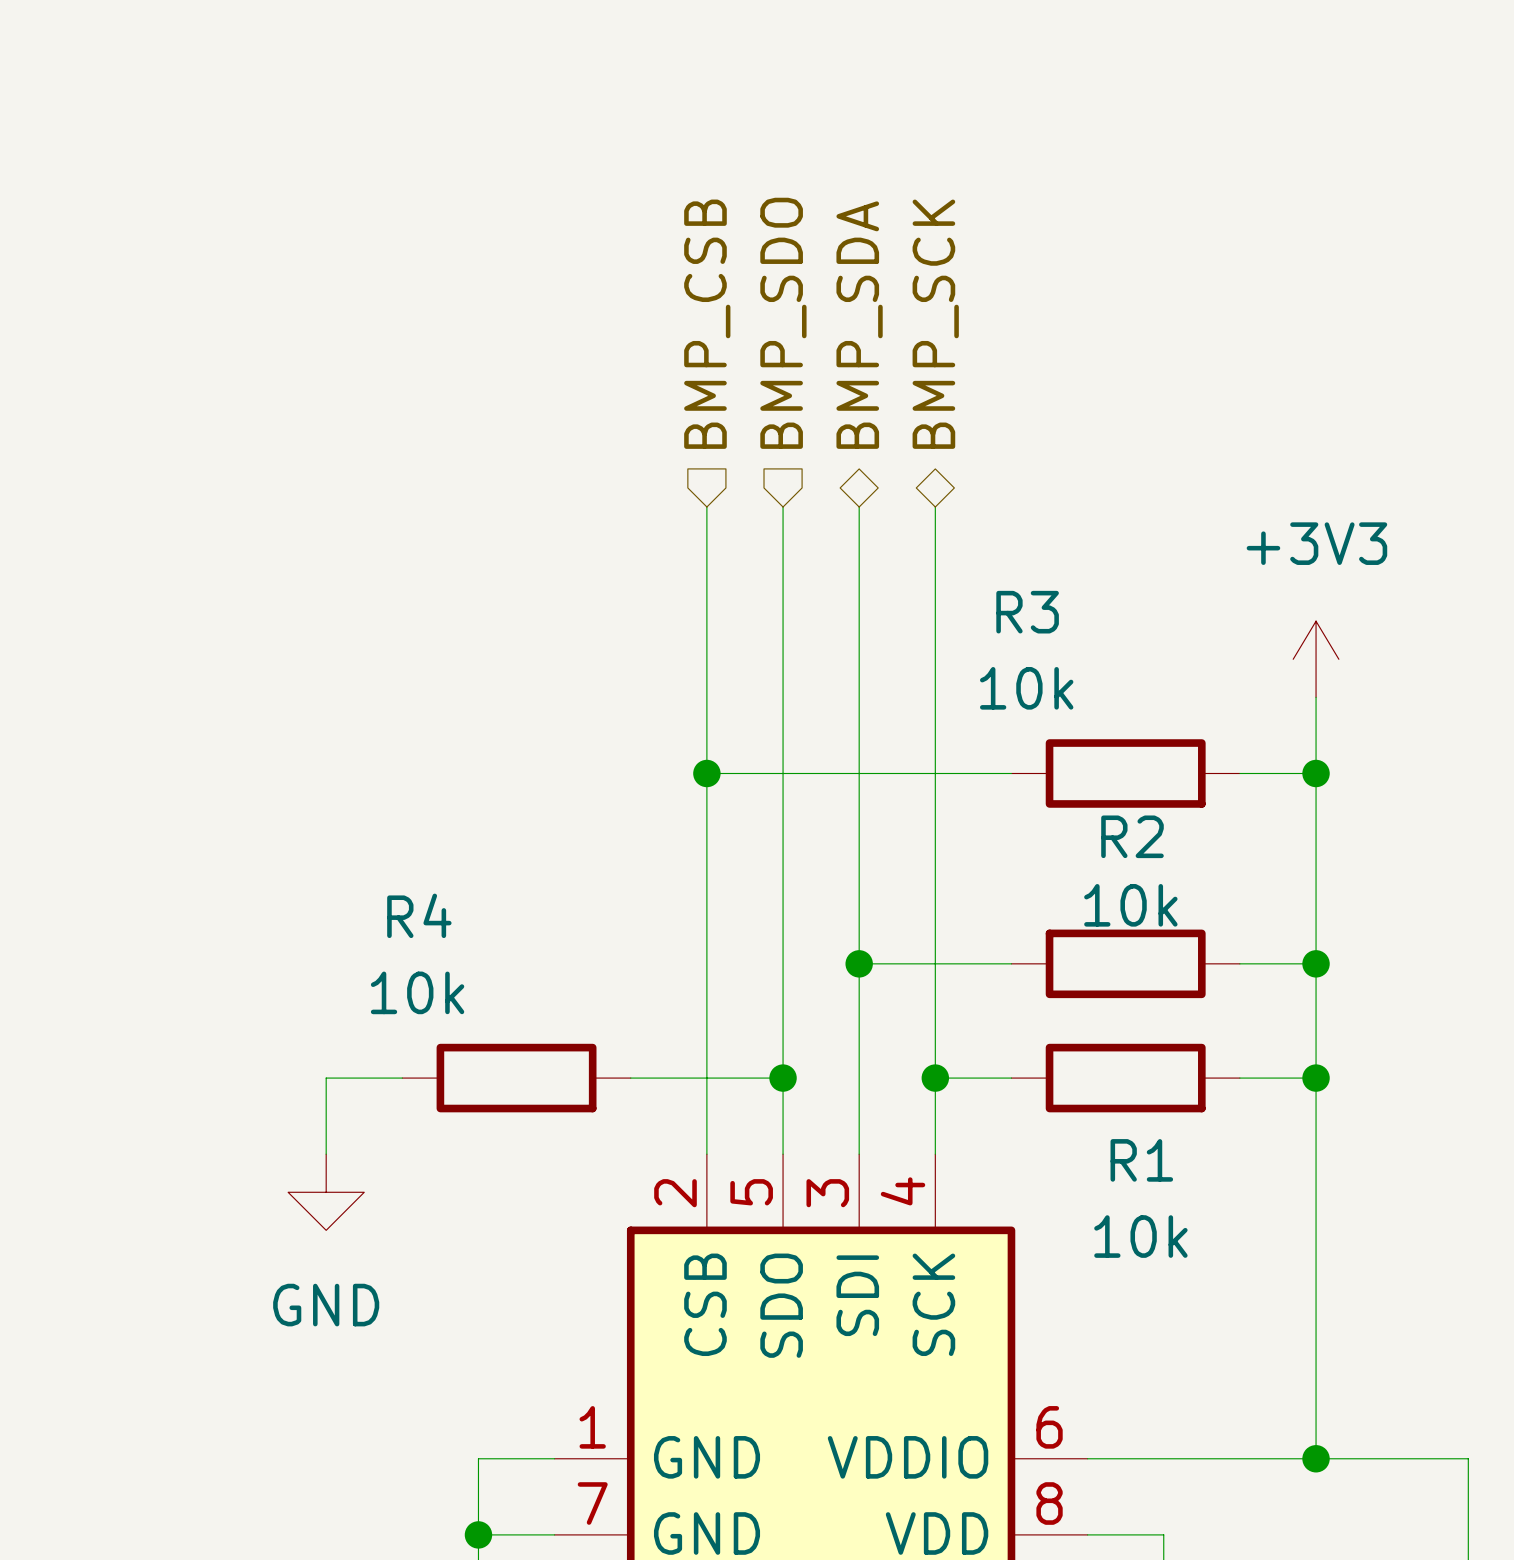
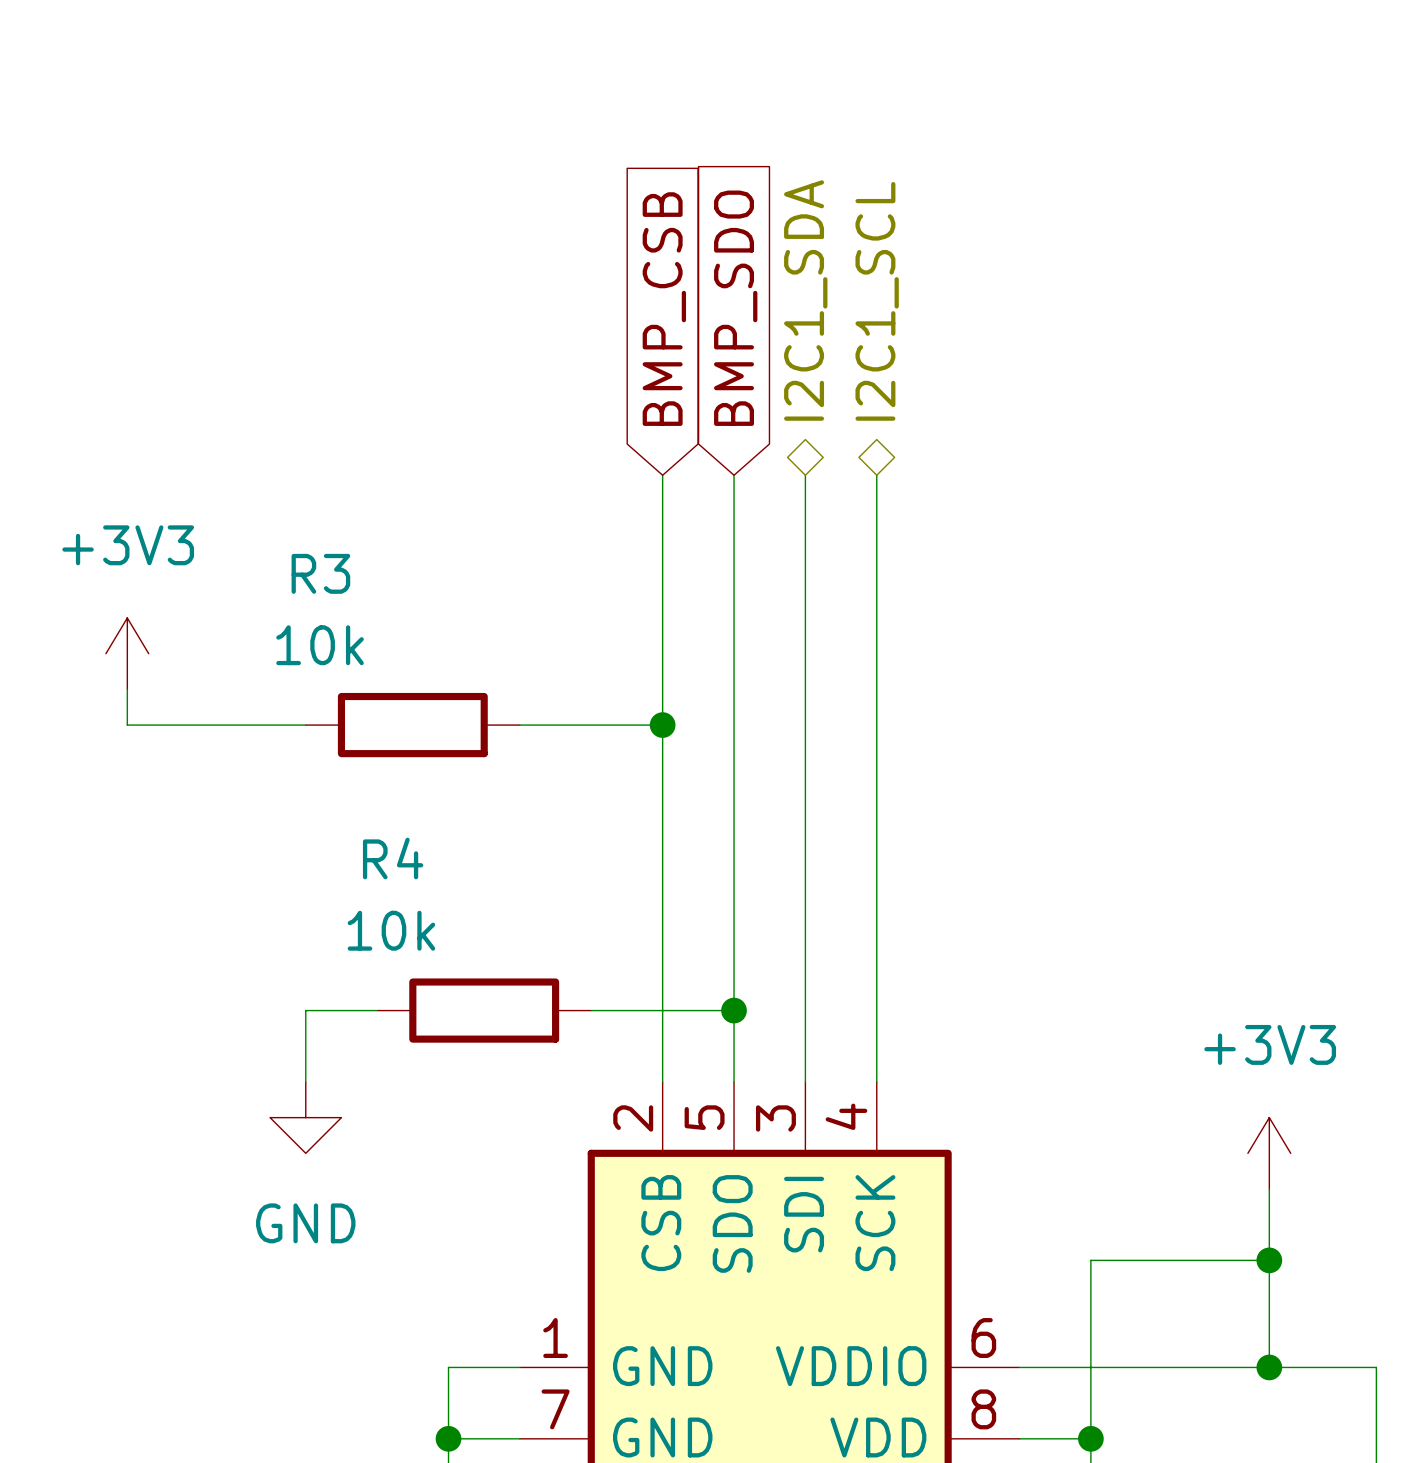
hierarchical label: BMP_SDO (783, 323) -> none
hierarchical label: BMP_CSB (707, 324) -> none
hierarchical label: BMP_SCK (935, 324) -> I2C1_SCL (877, 301)
hierarchical label: BMP_SDA (859, 325) -> I2C1_SDA (805, 300)
global label: none -> BMP_SDO (735, 308)
global label: none -> BMP_CSB (664, 309)
power symbol position: +3V3 (1316, 659) -> +3V3 (1269, 1153)
power symbol: none -> +3V3 (127, 653)
wire: (1316, 697) (1316, 1458) -> none
wire: none -> (127, 689) (127, 725) (305, 725)
wire: (706, 773) (1011, 773) -> (662, 725) (519, 725)
R3 position: (1125, 773) -> (412, 725)
wire: (1239, 773) (1316, 773) -> none
junction: (1316, 773) -> none
wire: (859, 963) (1011, 963) -> none
junction: (859, 963) -> none
R2: 10k (1125, 963) -> none
wire: (1239, 963) (1316, 963) -> none
junction: (1316, 963) -> none
wire: (935, 1078) (1011, 1078) -> none
junction: (935, 1078) -> none
R1: 10k (1125, 1078) -> none
wire: (1239, 1078) (1316, 1078) -> none
junction: (1316, 1078) -> none
wire: none -> (1269, 1189) (1269, 1367)
wire: none -> (1269, 1260) (1090, 1260) (1090, 1438)
junction: none -> (1269, 1260)
junction position: (1316, 1458) -> (1269, 1367)
junction: none -> (1090, 1438)

